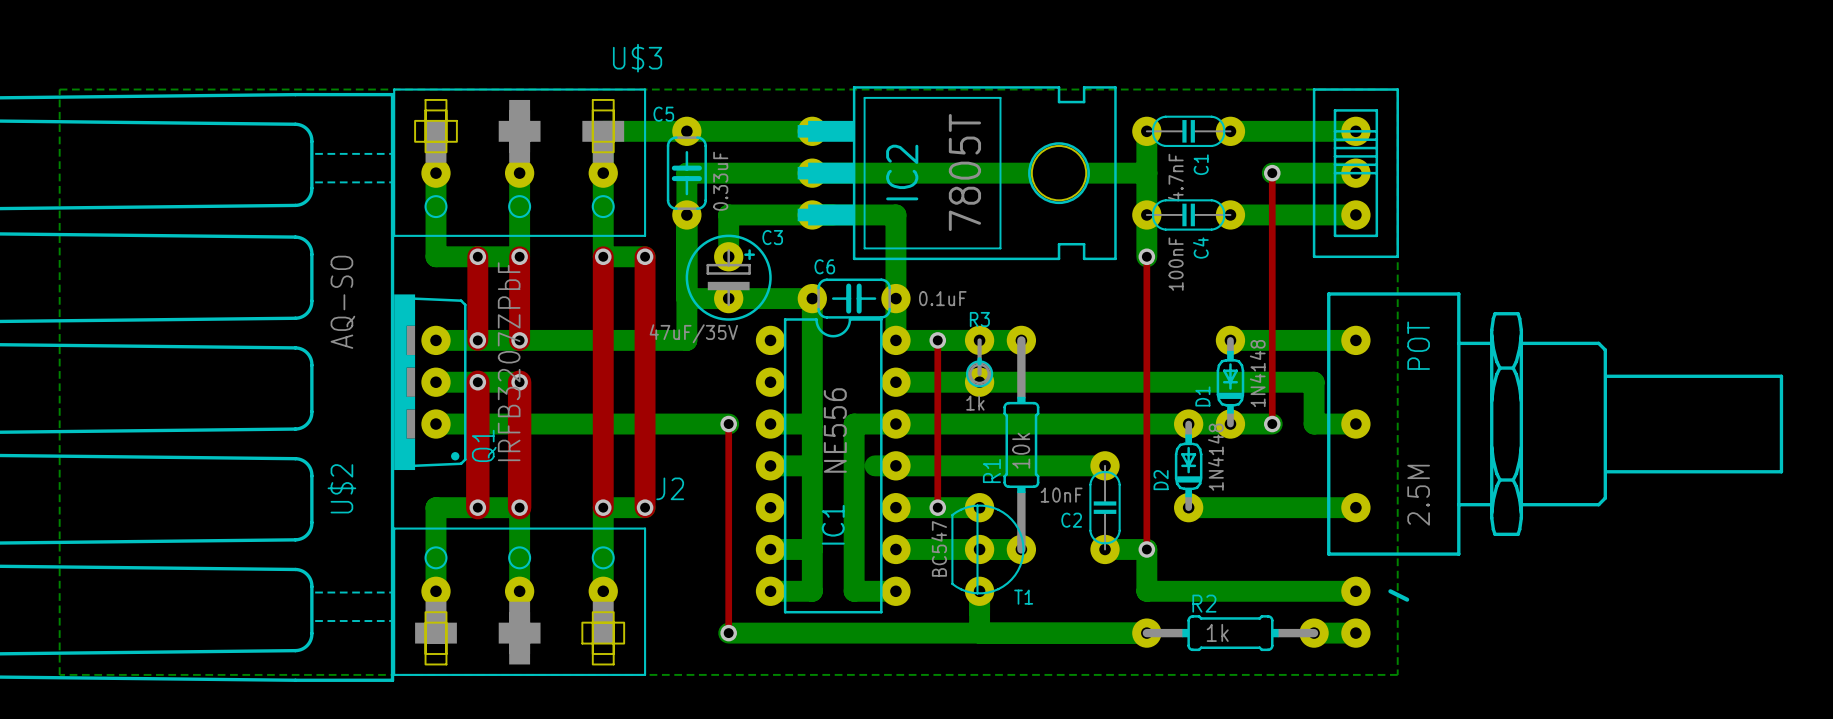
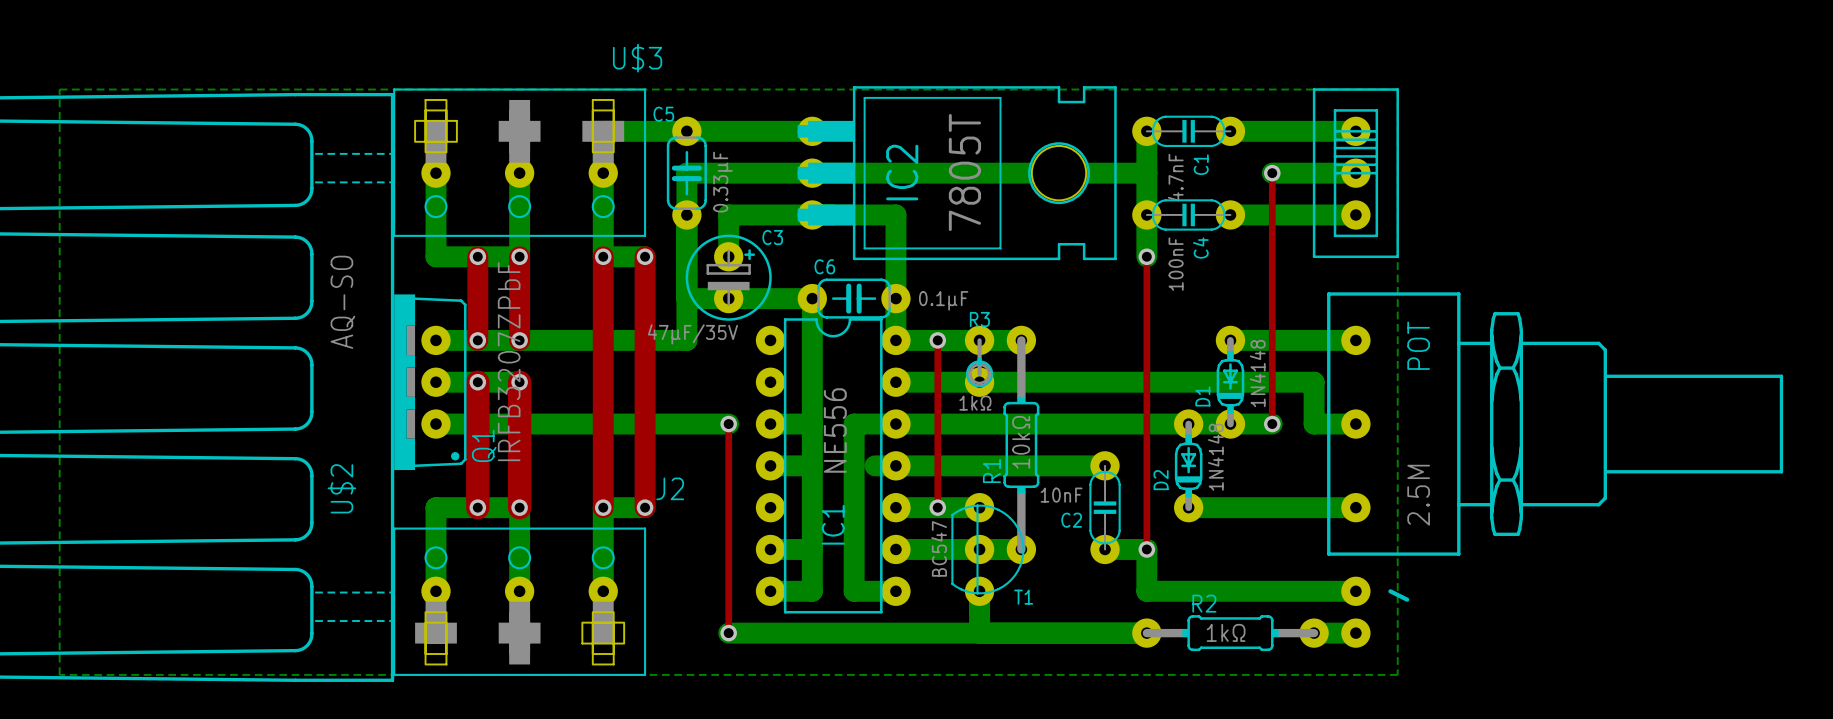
C5 value: 0.33uF (720, 181) -> 0.33μF (722, 182)
C6 value: 0.1uF (942, 298) -> 0.1μF (943, 300)
C3 value: 47uF/35V (693, 333) -> 47μF/35V (692, 334)
R3 value: 1k (975, 403) -> 1kΩ (975, 403)
R1 value: 10k (1021, 450) -> 10kΩ (1021, 442)
R2 value: 1k (1217, 632) -> 1kΩ (1226, 632)

